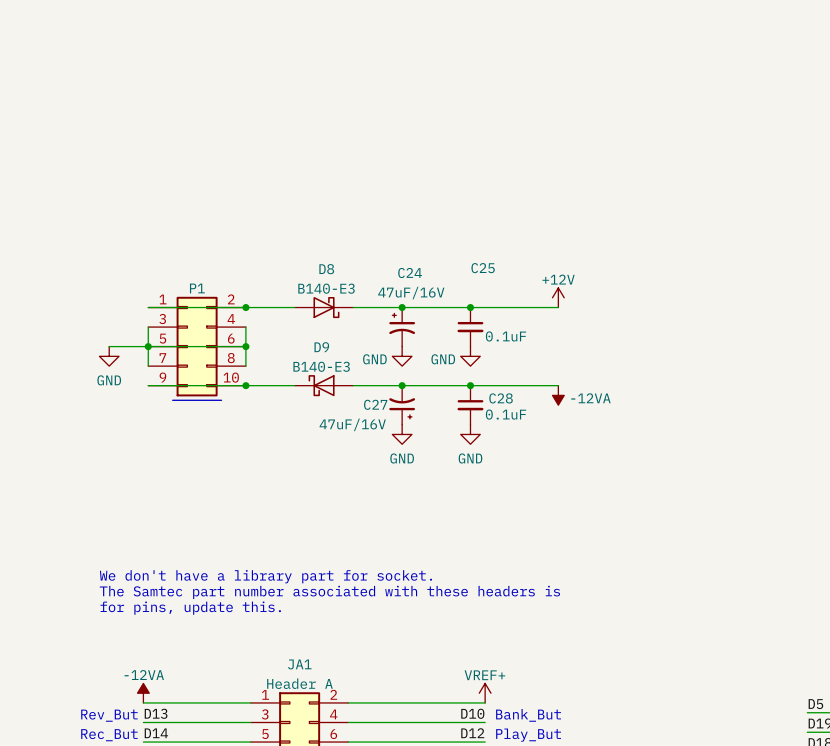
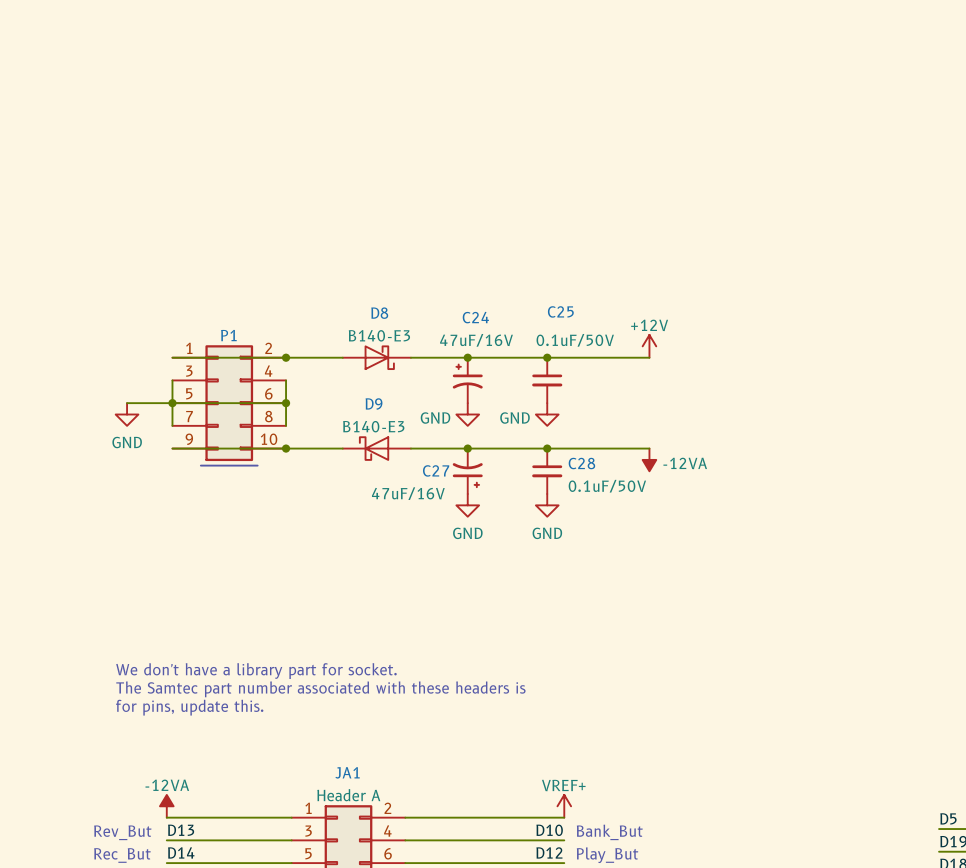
C25 text: 0.1uF (506, 336) -> 0.1uF/50V (575, 340)
C28 text: 0.1uF (506, 414) -> 0.1uF/50V (607, 486)

